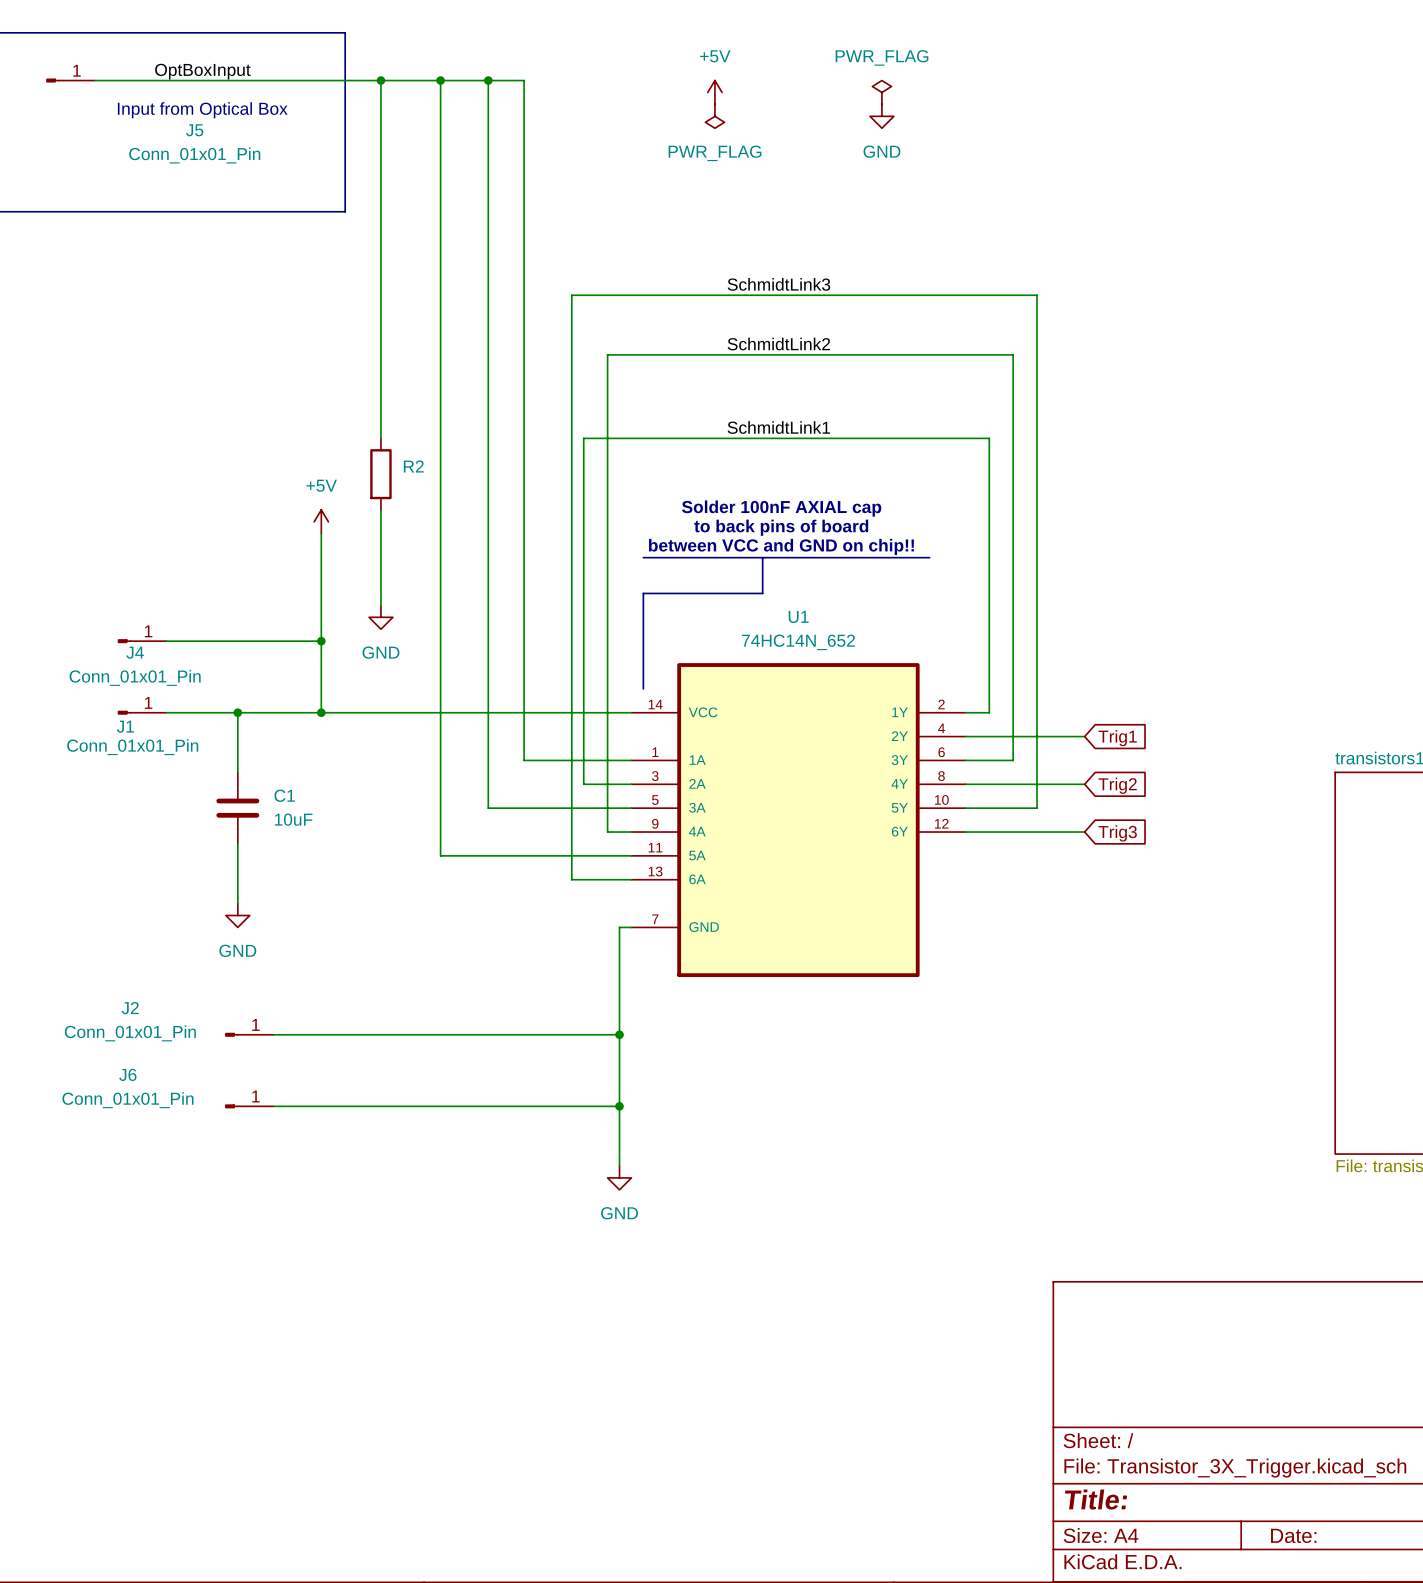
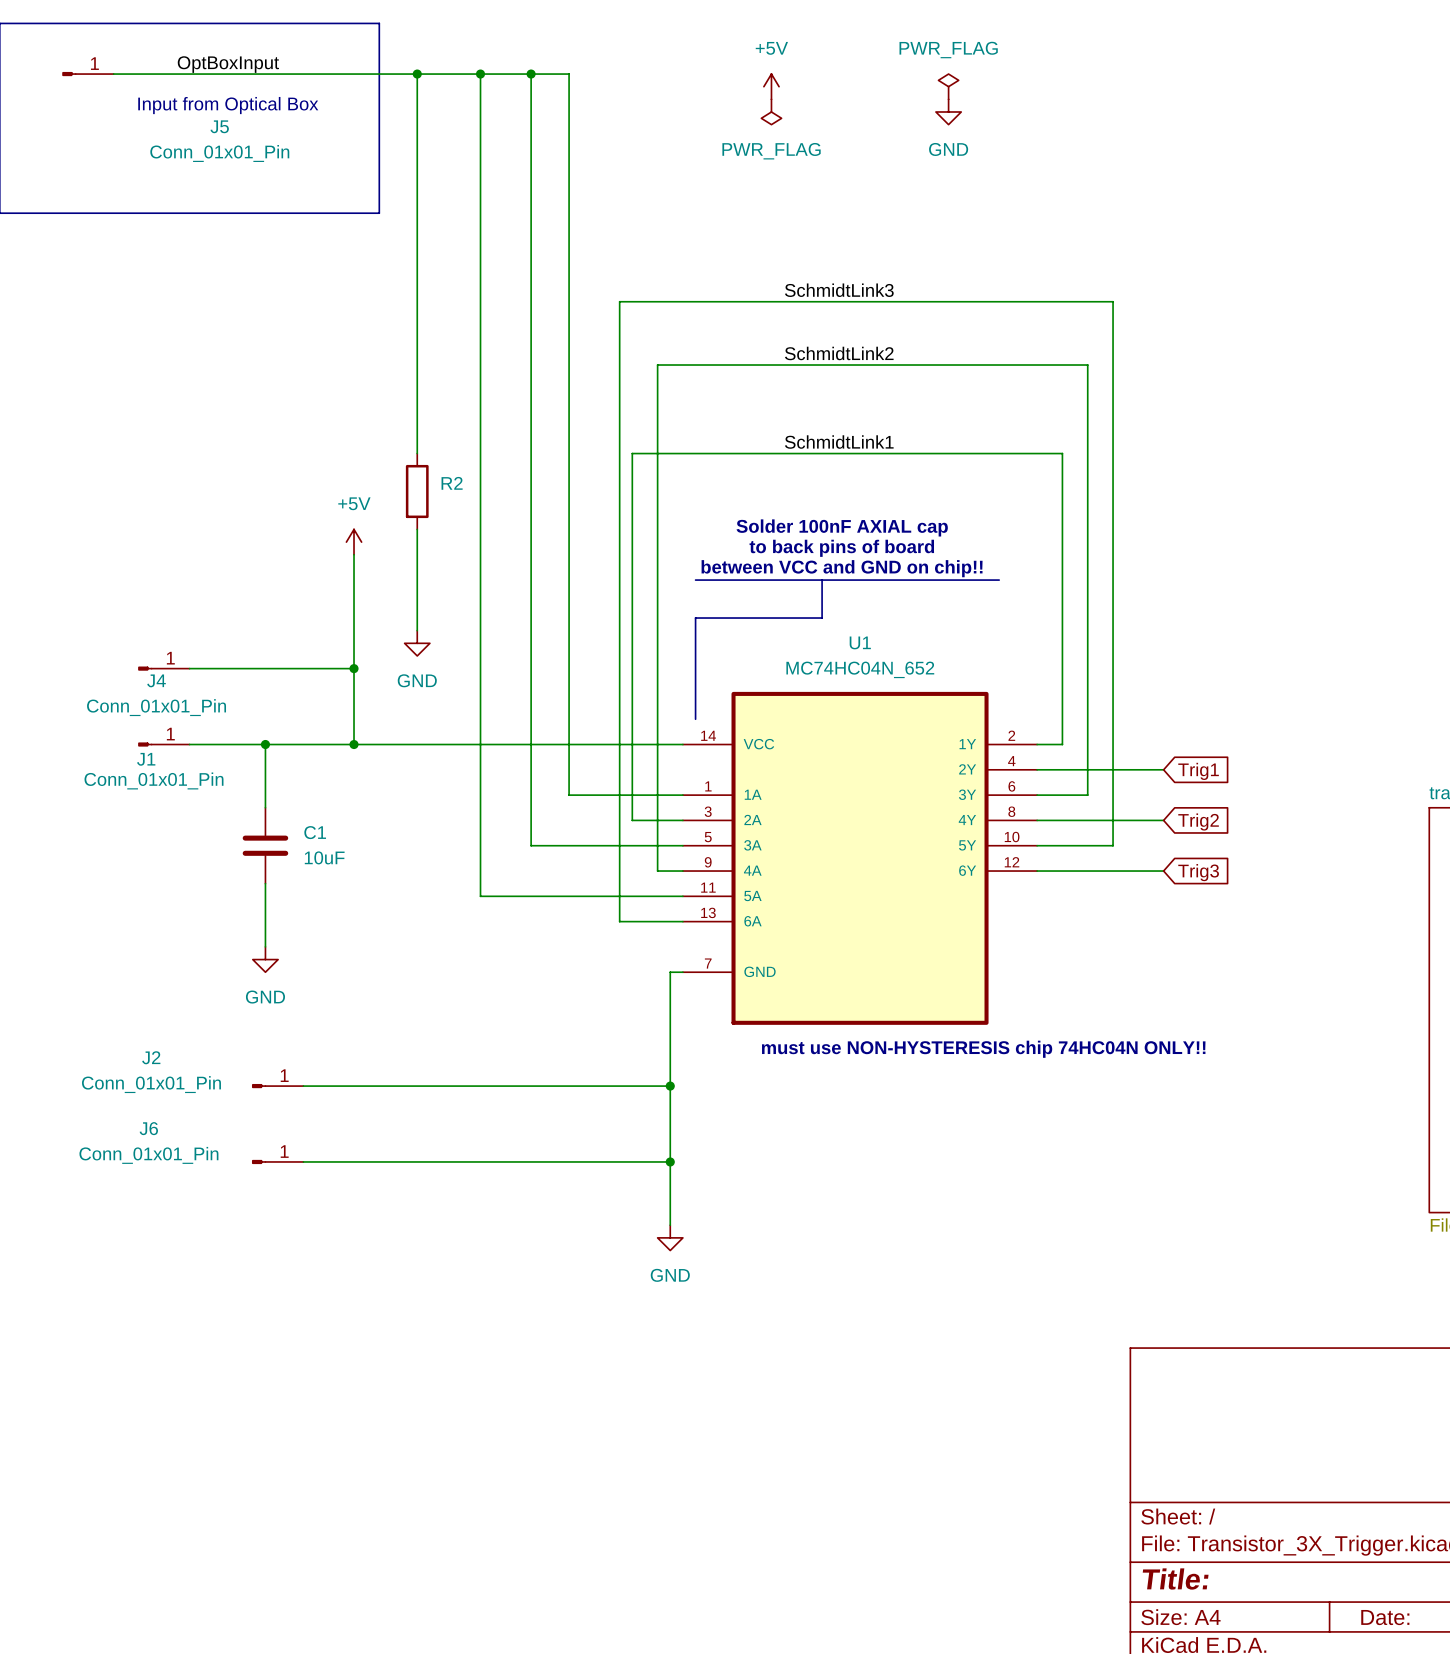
U1 value: 74HC14N_652 (798, 642) -> MC74HC04N_652 (860, 669)
text: none -> must use NON-HYSTERESIS chip 74HC04N ONLY!! (983, 1049)

